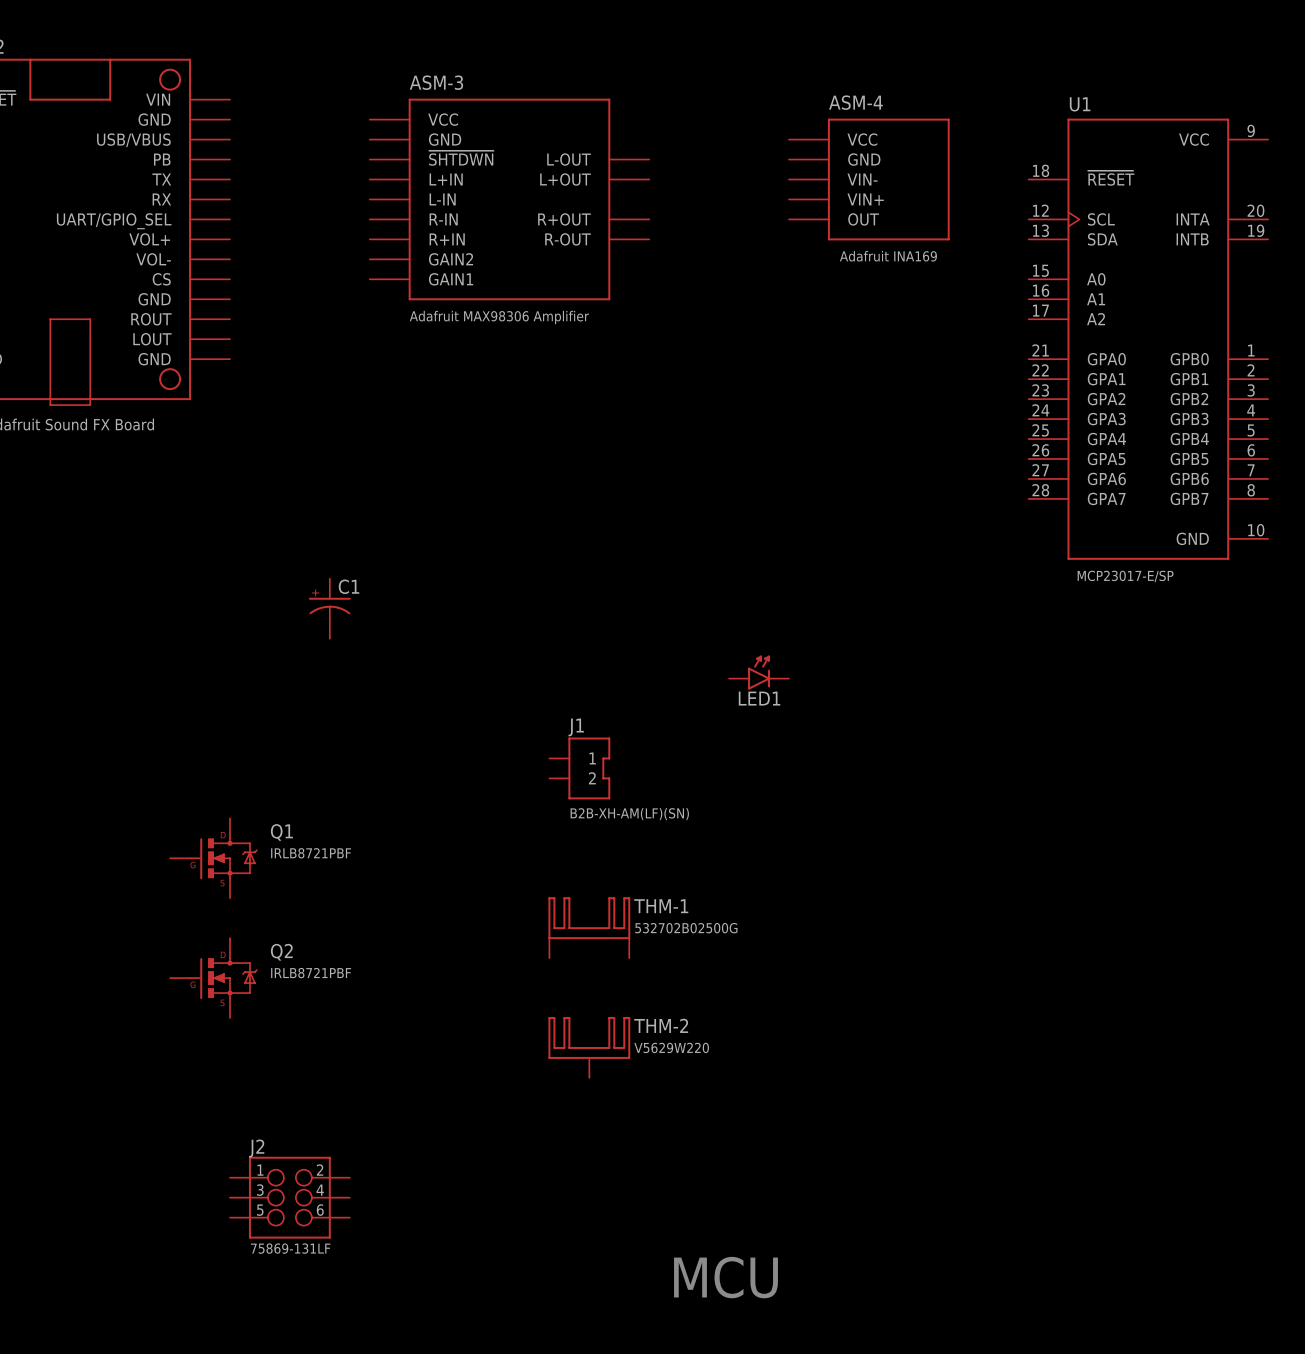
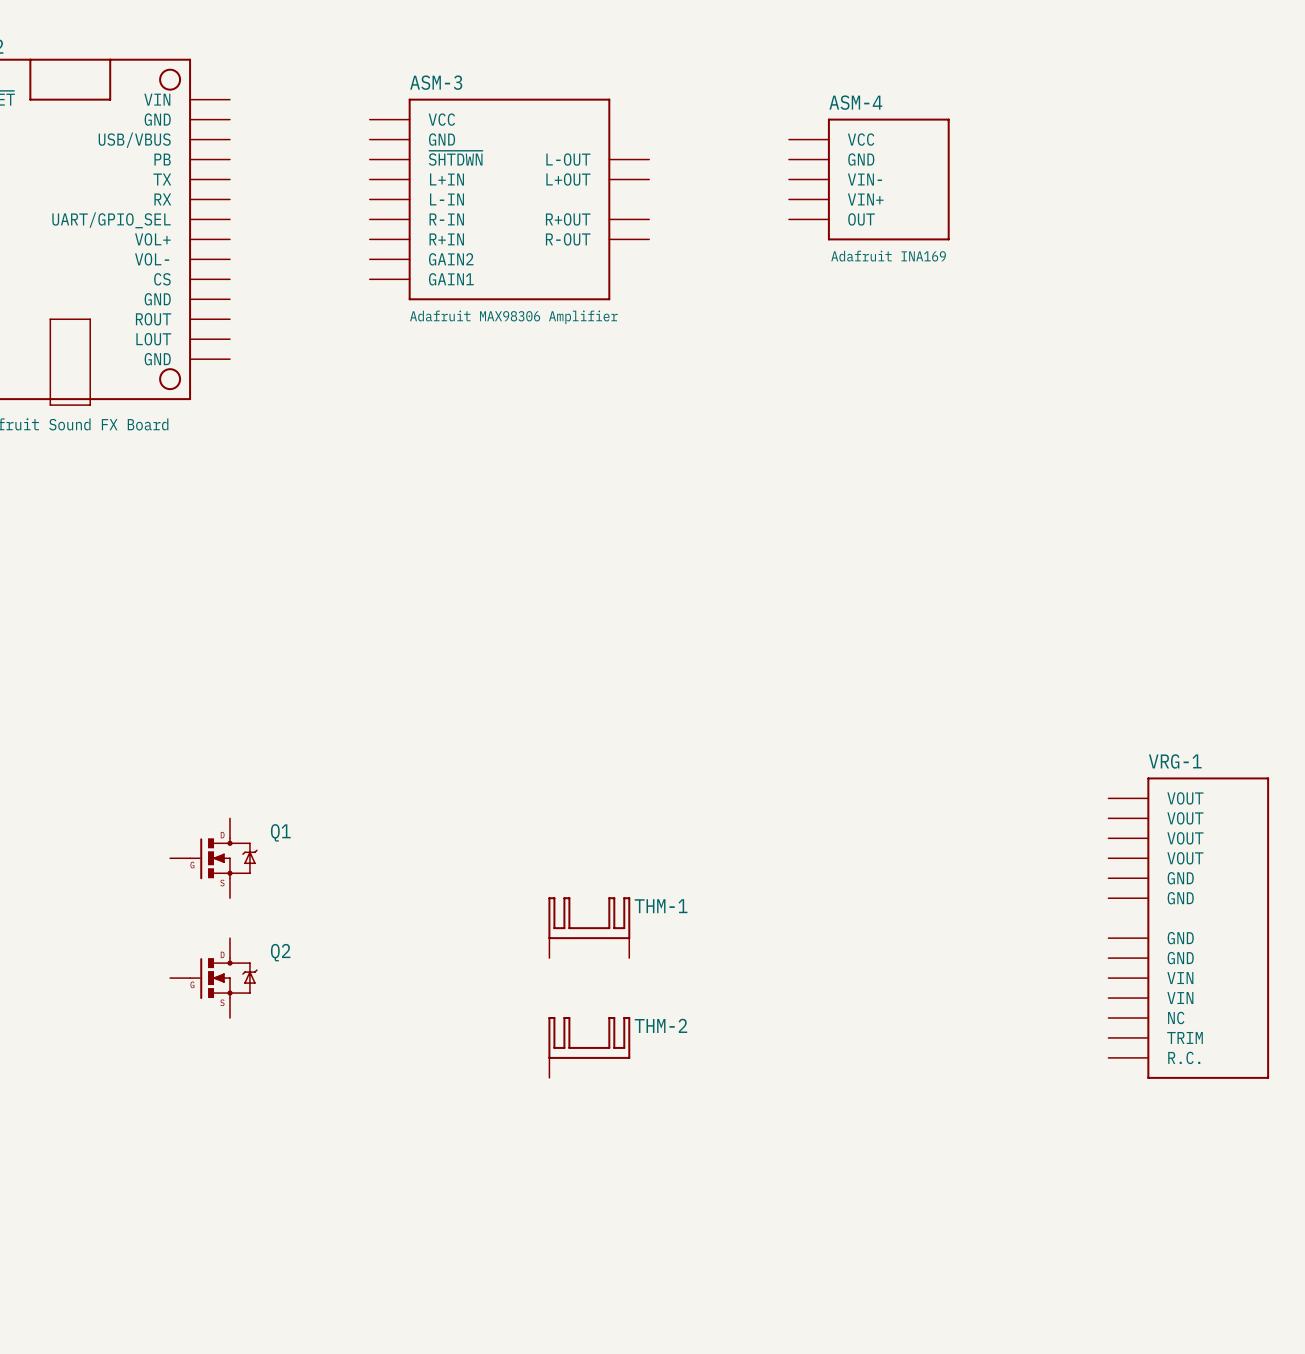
U1: MCP23017-E/SP (1148, 339) -> none
C1: (329, 608) -> none
LED1: (759, 672) -> none
J1: B2B-XH-AM(LF)(SN) (579, 768) -> none
Q1 value: IRLB8721PBF (311, 853) -> none
THM-1 value: 532702B02500G (686, 928) -> none
VRG-1: none -> (1188, 928)
Q2 value: IRLB8721PBF (311, 973) -> none
THM-2 symbol: [548, 1017, 631, 1078] -> [548, 1017, 631, 1078]
THM-2 value: V5629W220 (671, 1047) -> none
J2: 75869-131LF (289, 1197) -> none
text: MCU (725, 1277) -> none

